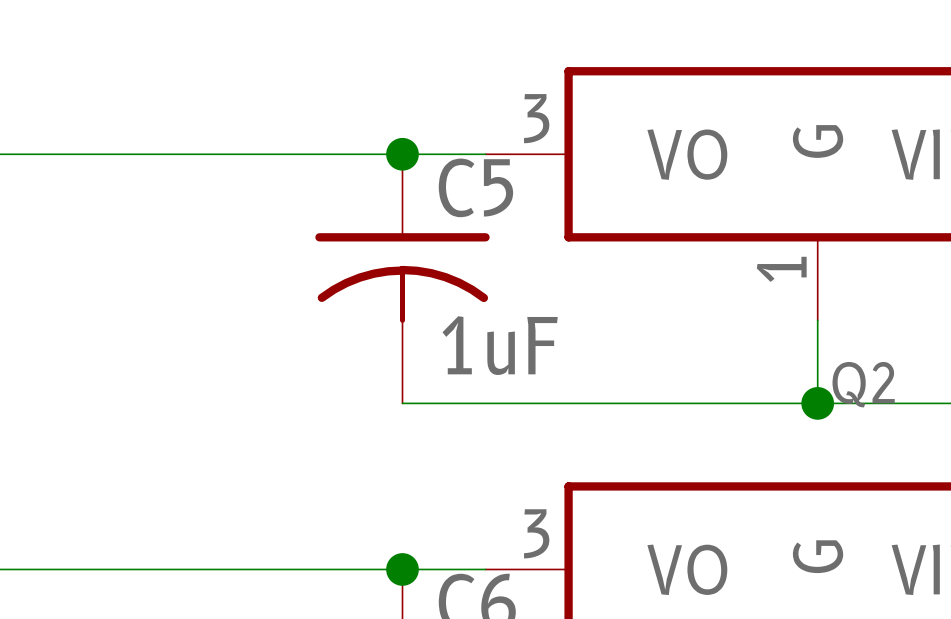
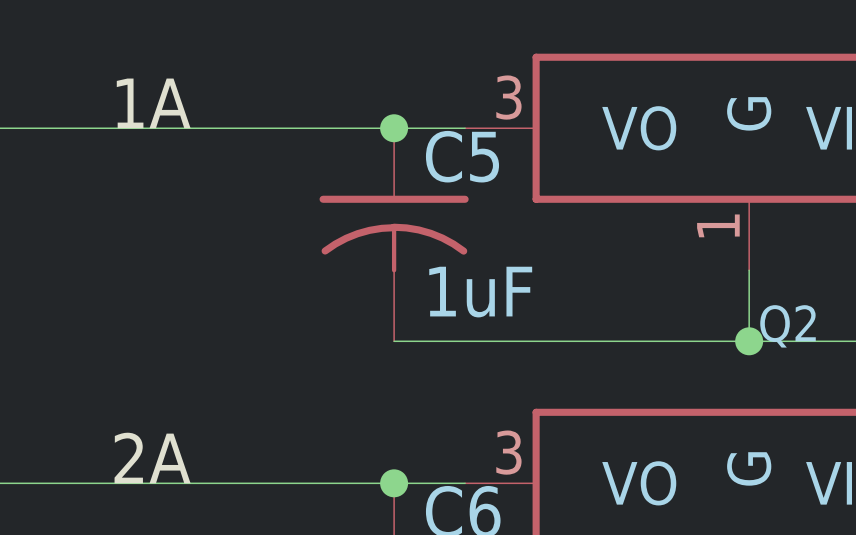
label: none -> 1A (153, 103)
label: none -> 2A (152, 458)

